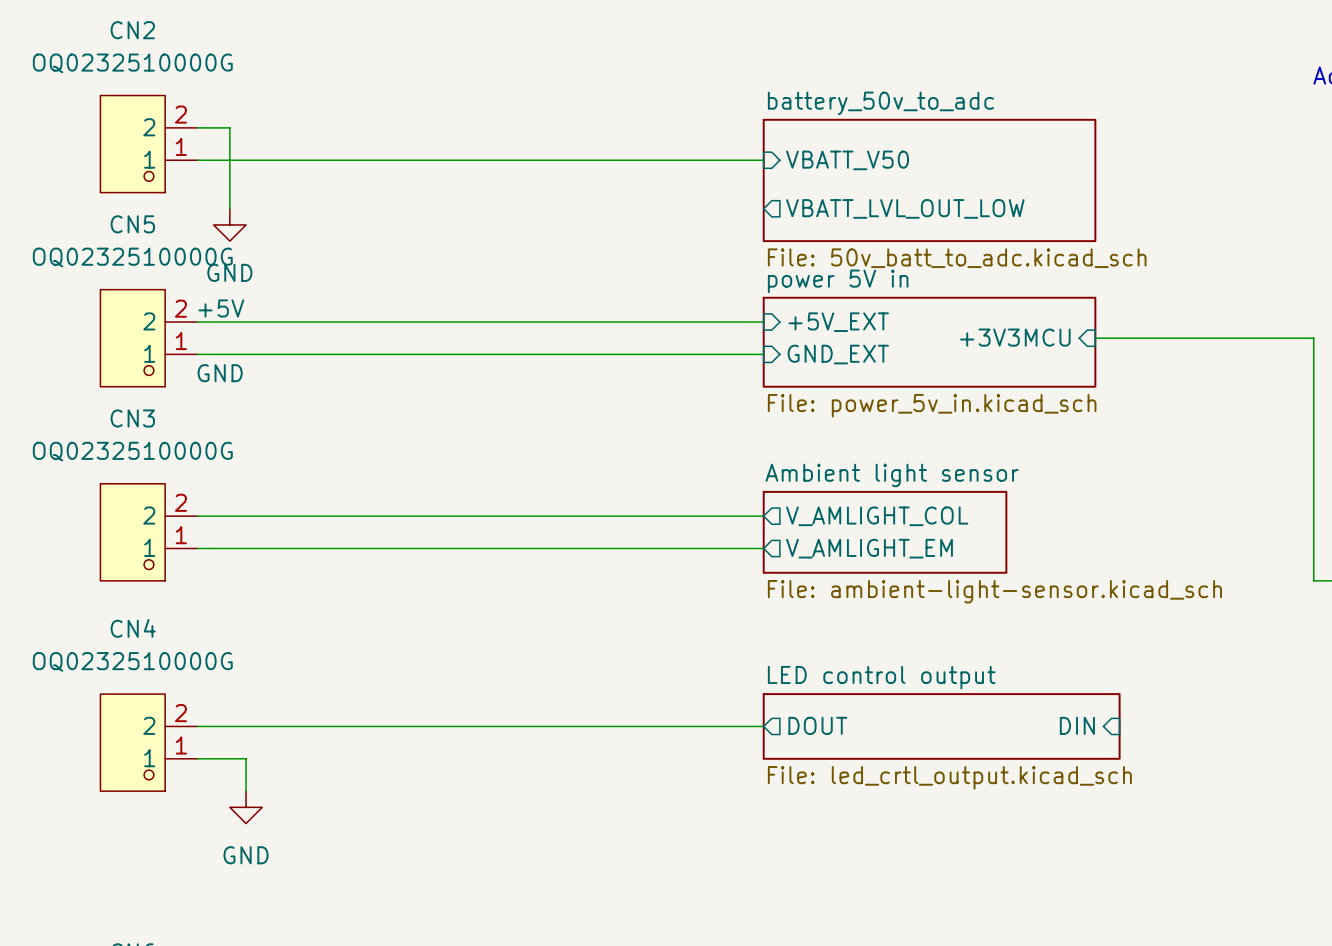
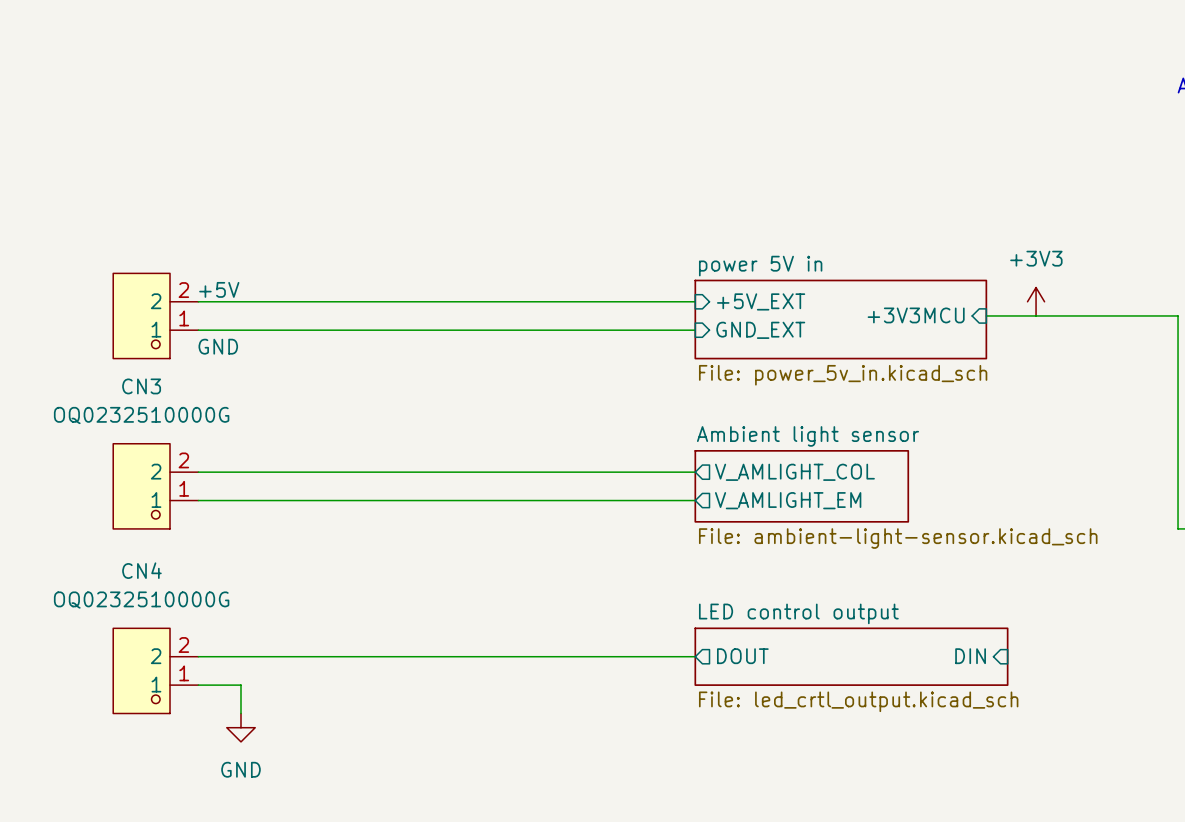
wire: (197, 127) (229, 127) (229, 208) -> none
CN2: OQ0232510000G (148, 144) -> none
wire: (197, 160) (763, 160) -> none
sheet pin: VBATT_V50 (847, 160) -> none
sheet battery_50v_to_adc: File: 50v_batt_to_adc.kicad_sch (929, 180) -> none
sheet pin: VBATT_LVL_OUT_LOW (905, 208) -> none
CN5 name: CN5 (132, 224) -> none
power symbol: GND (229, 224) -> none
CN5 value: OQ0232510000G (132, 257) -> none
power symbol: none -> +3V3 (1036, 301)

